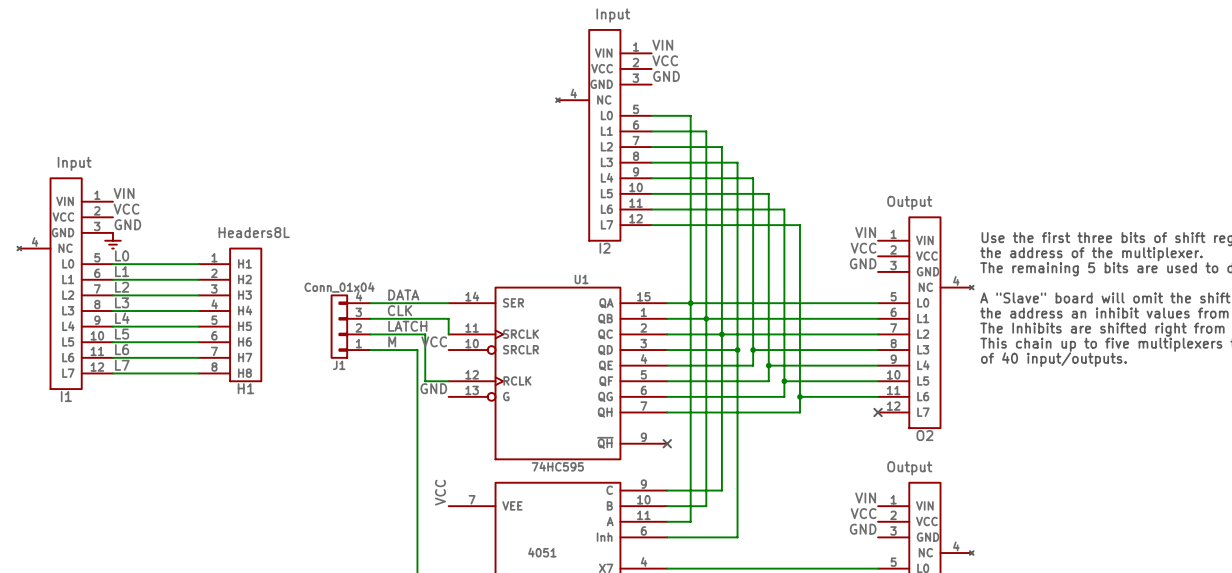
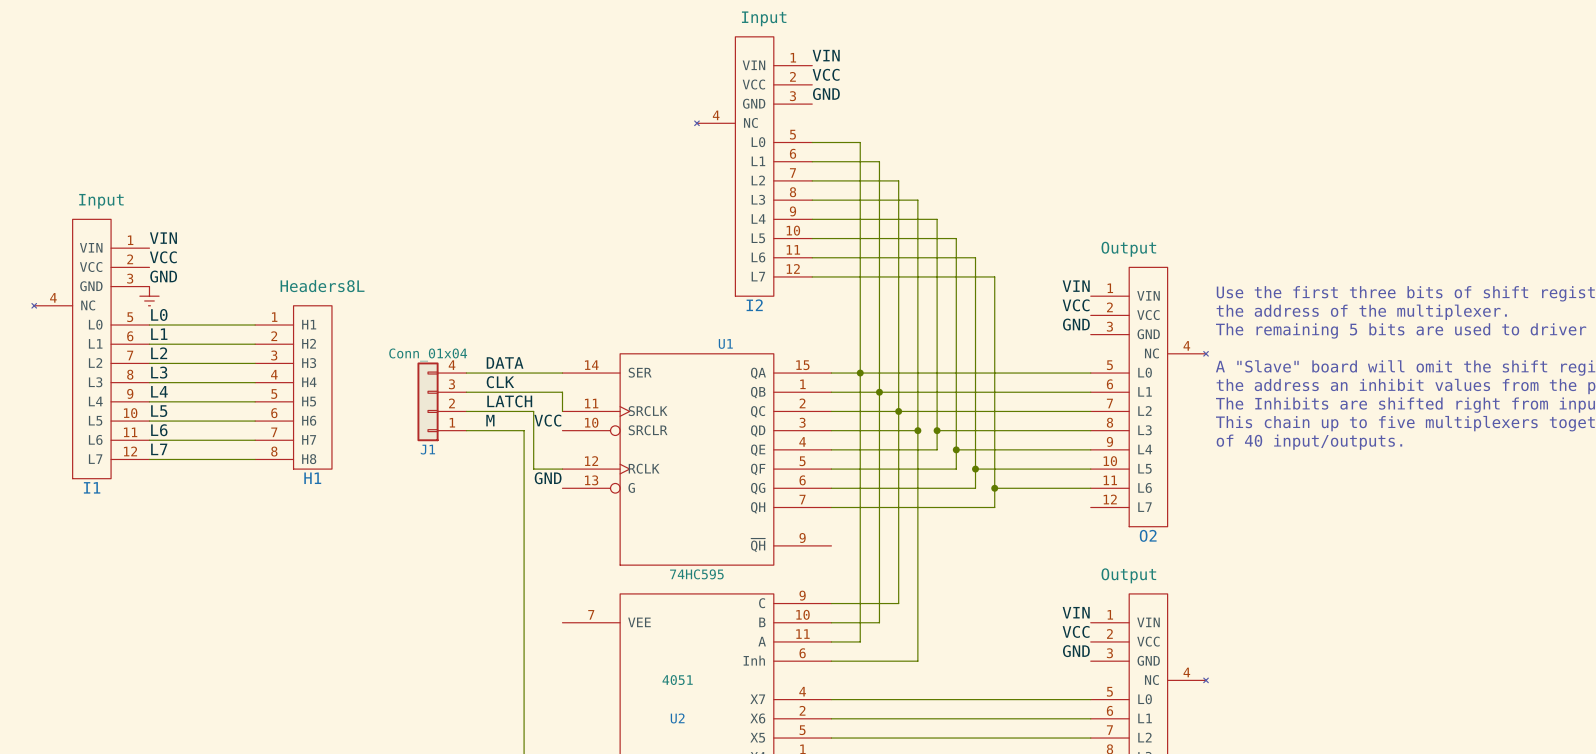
no-connect mark: (878, 412) -> none
no-connect mark: (667, 443) -> none
label: VCC (440, 492) -> none

